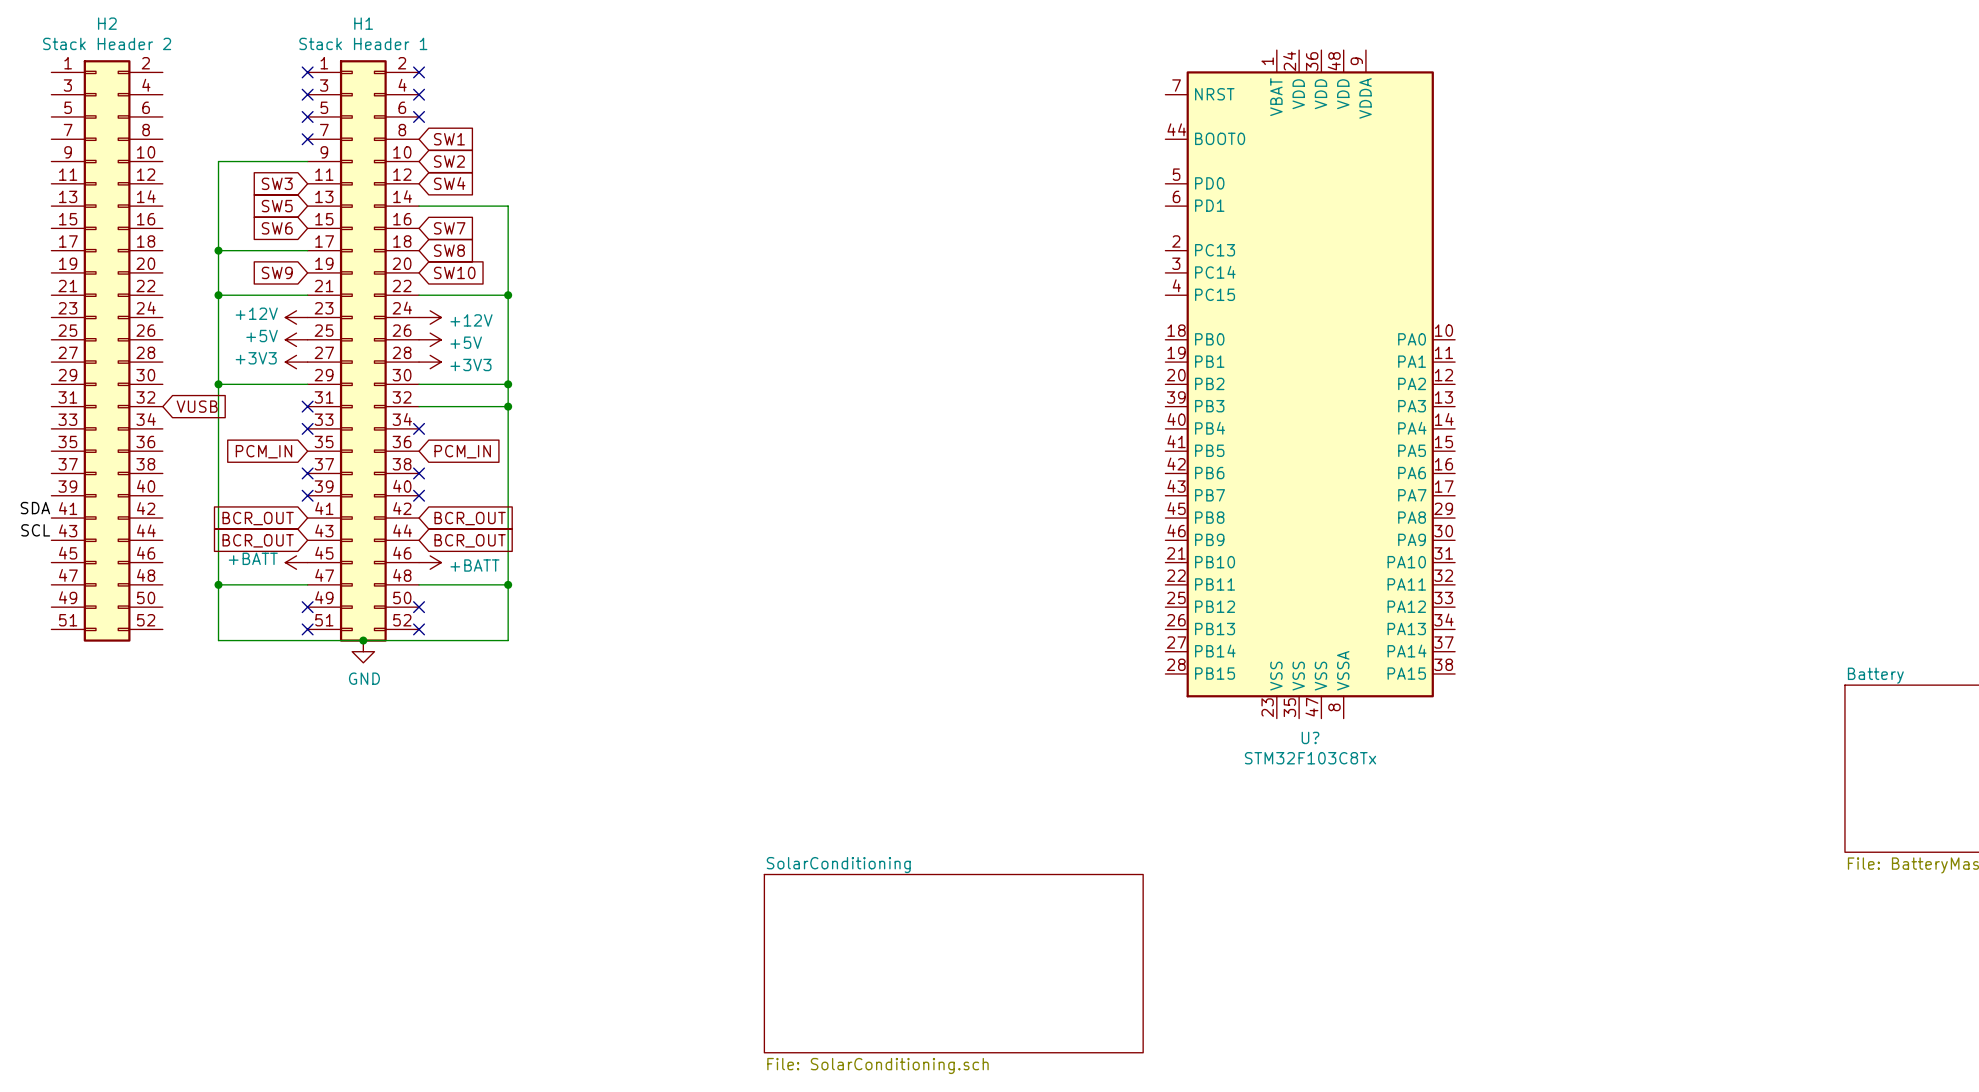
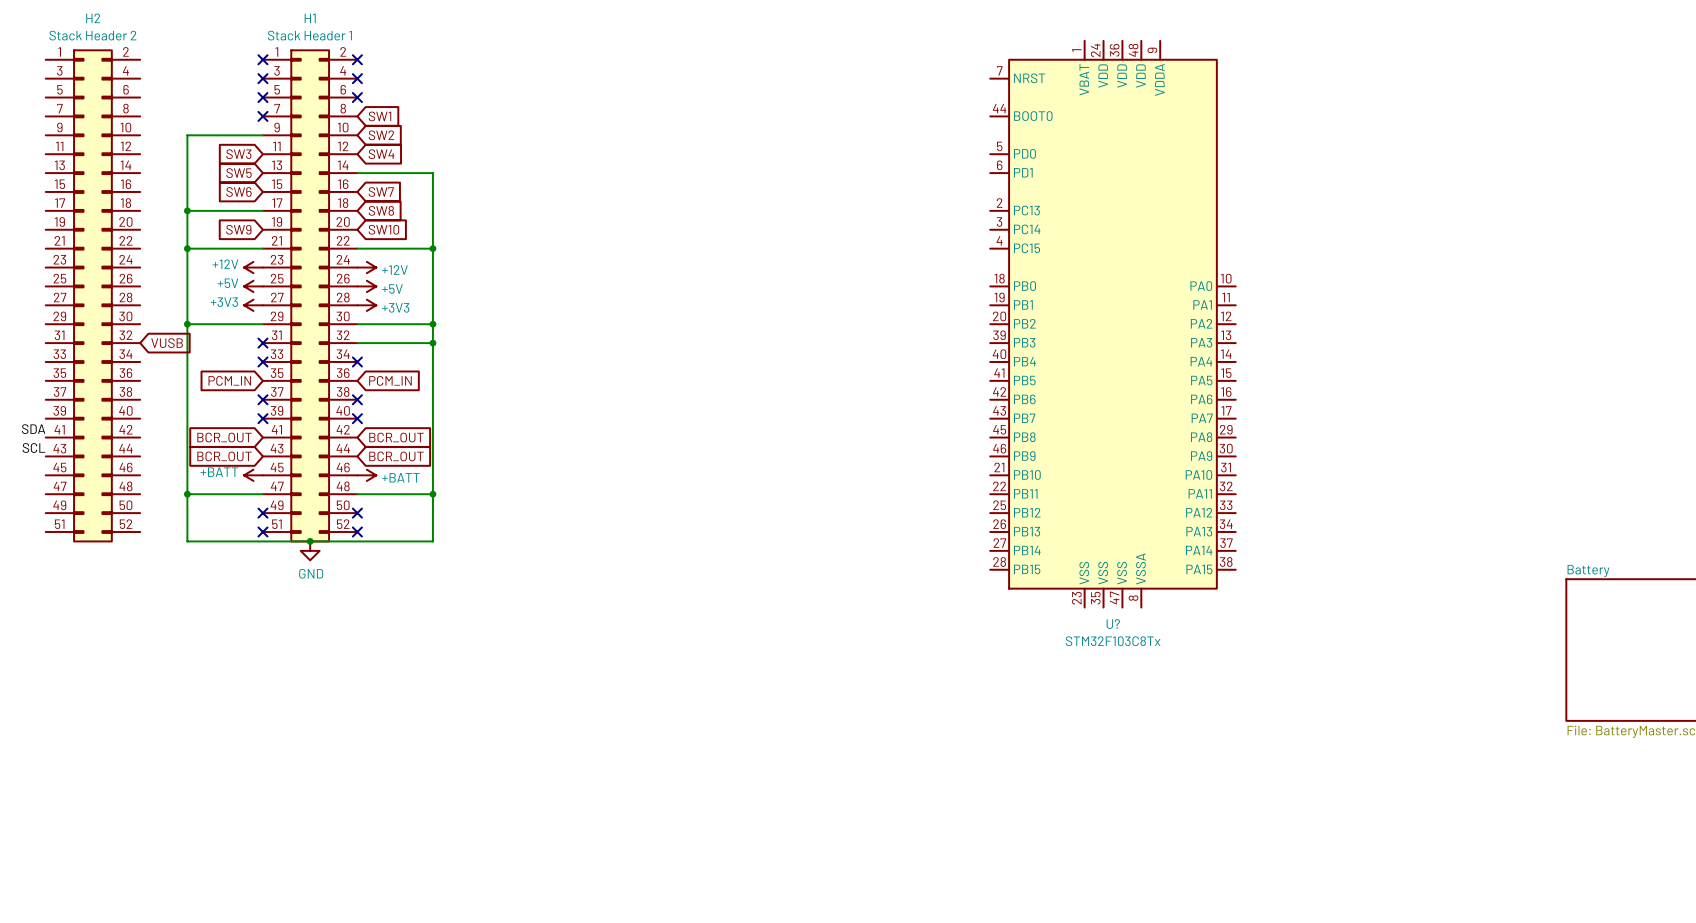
sheet SolarConditioning: File: SolarConditioning.sch (953, 963) -> none

